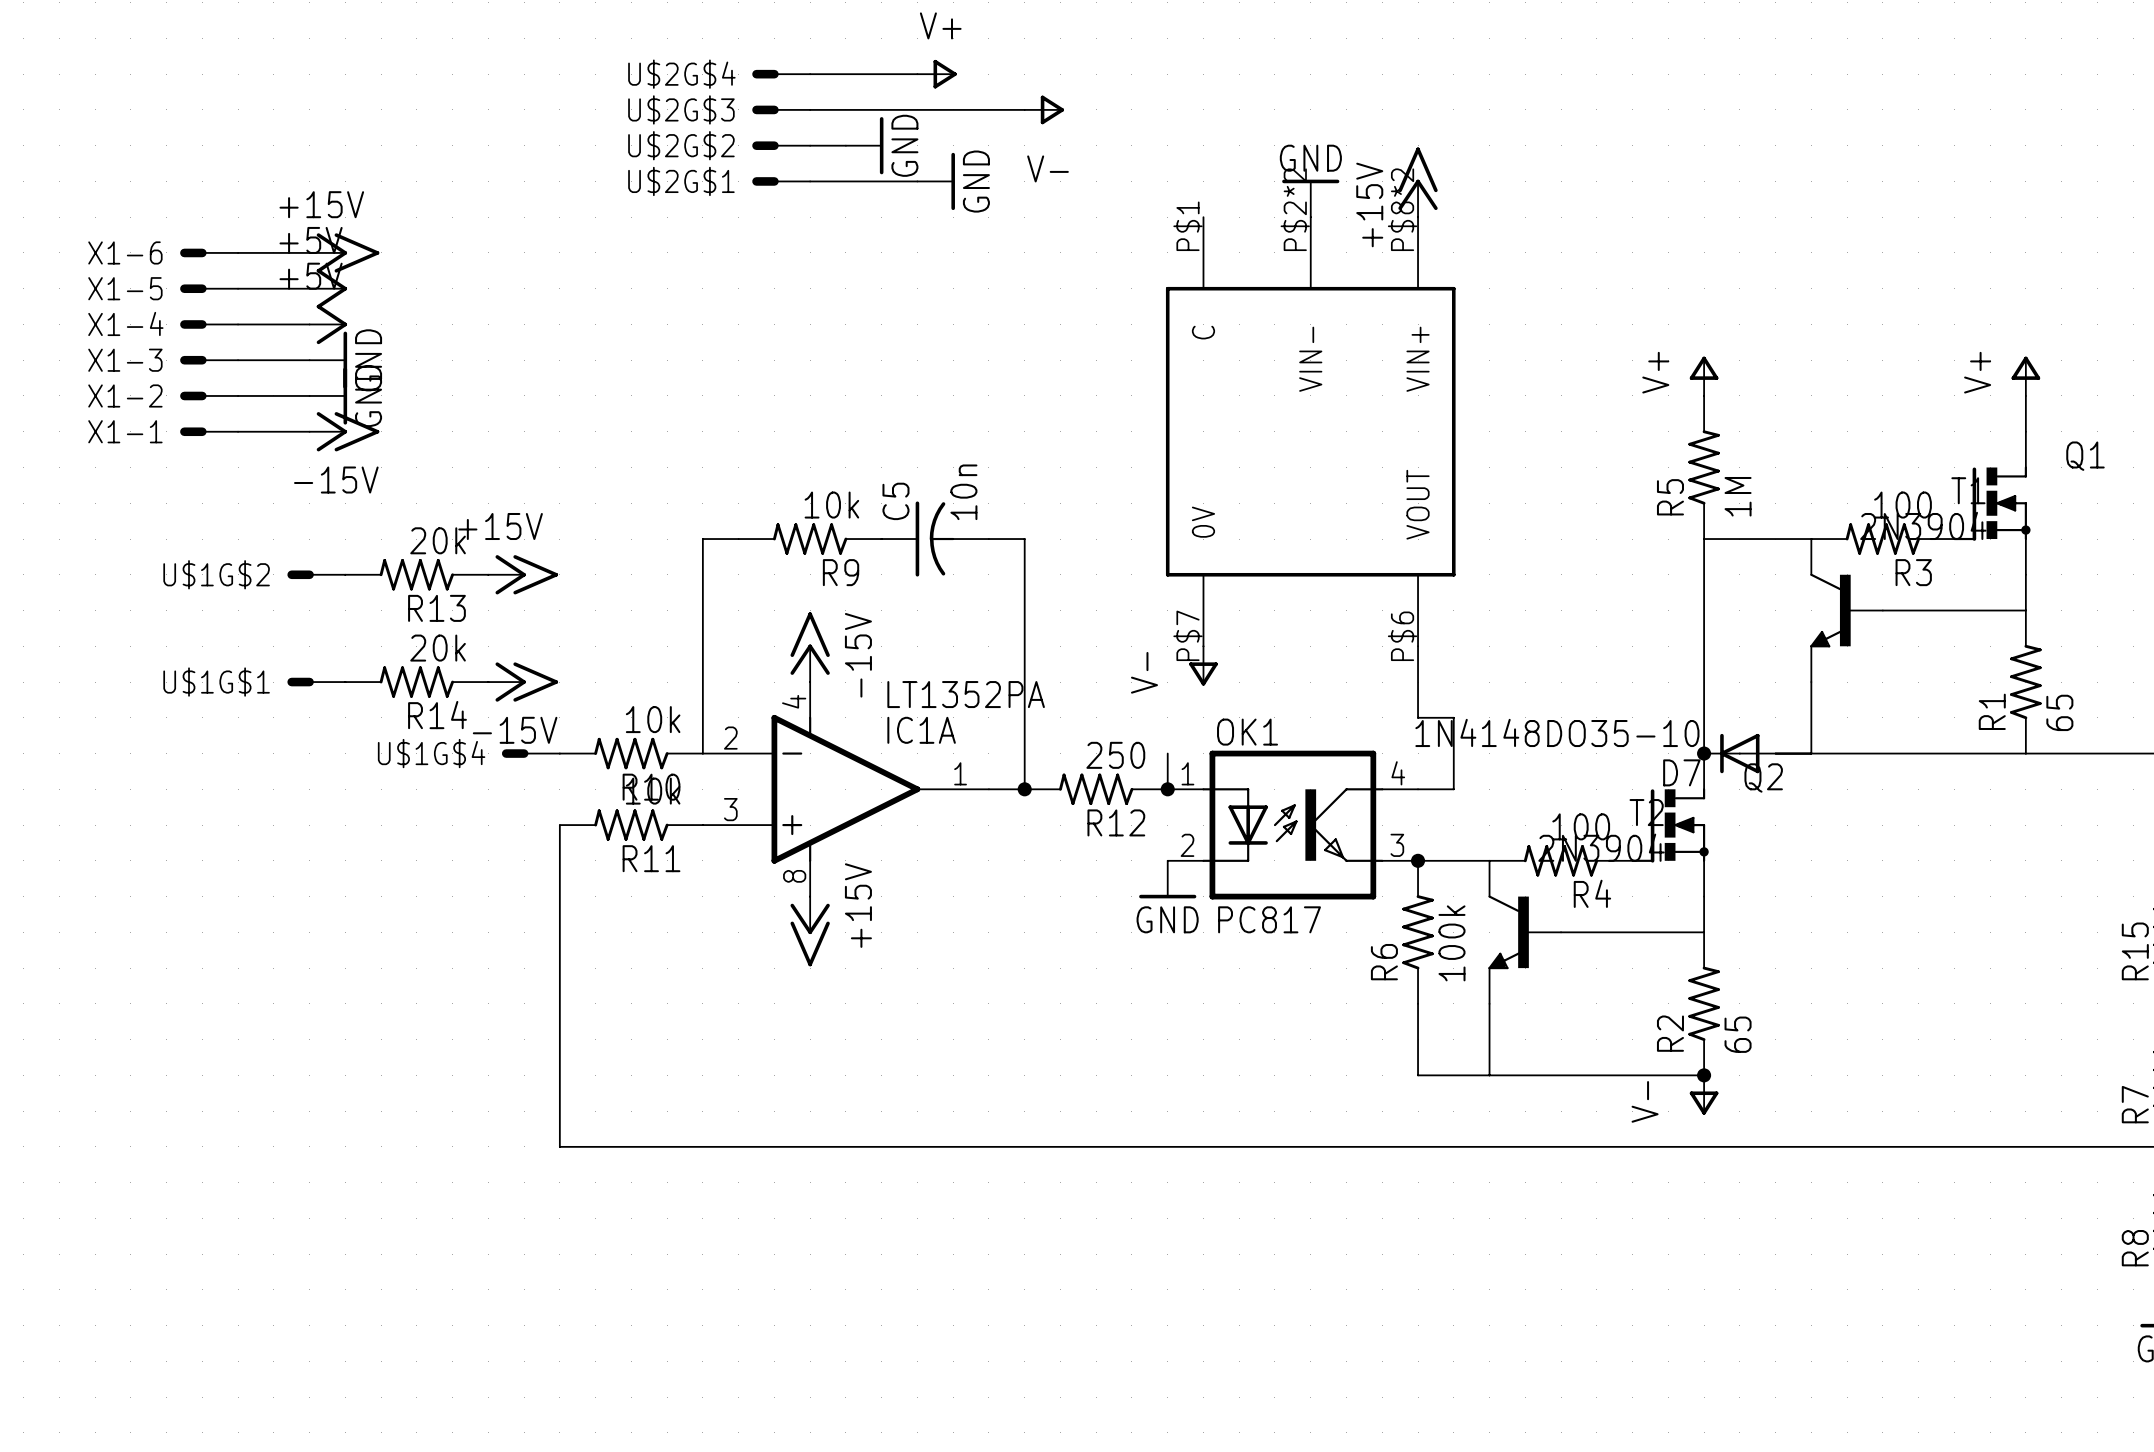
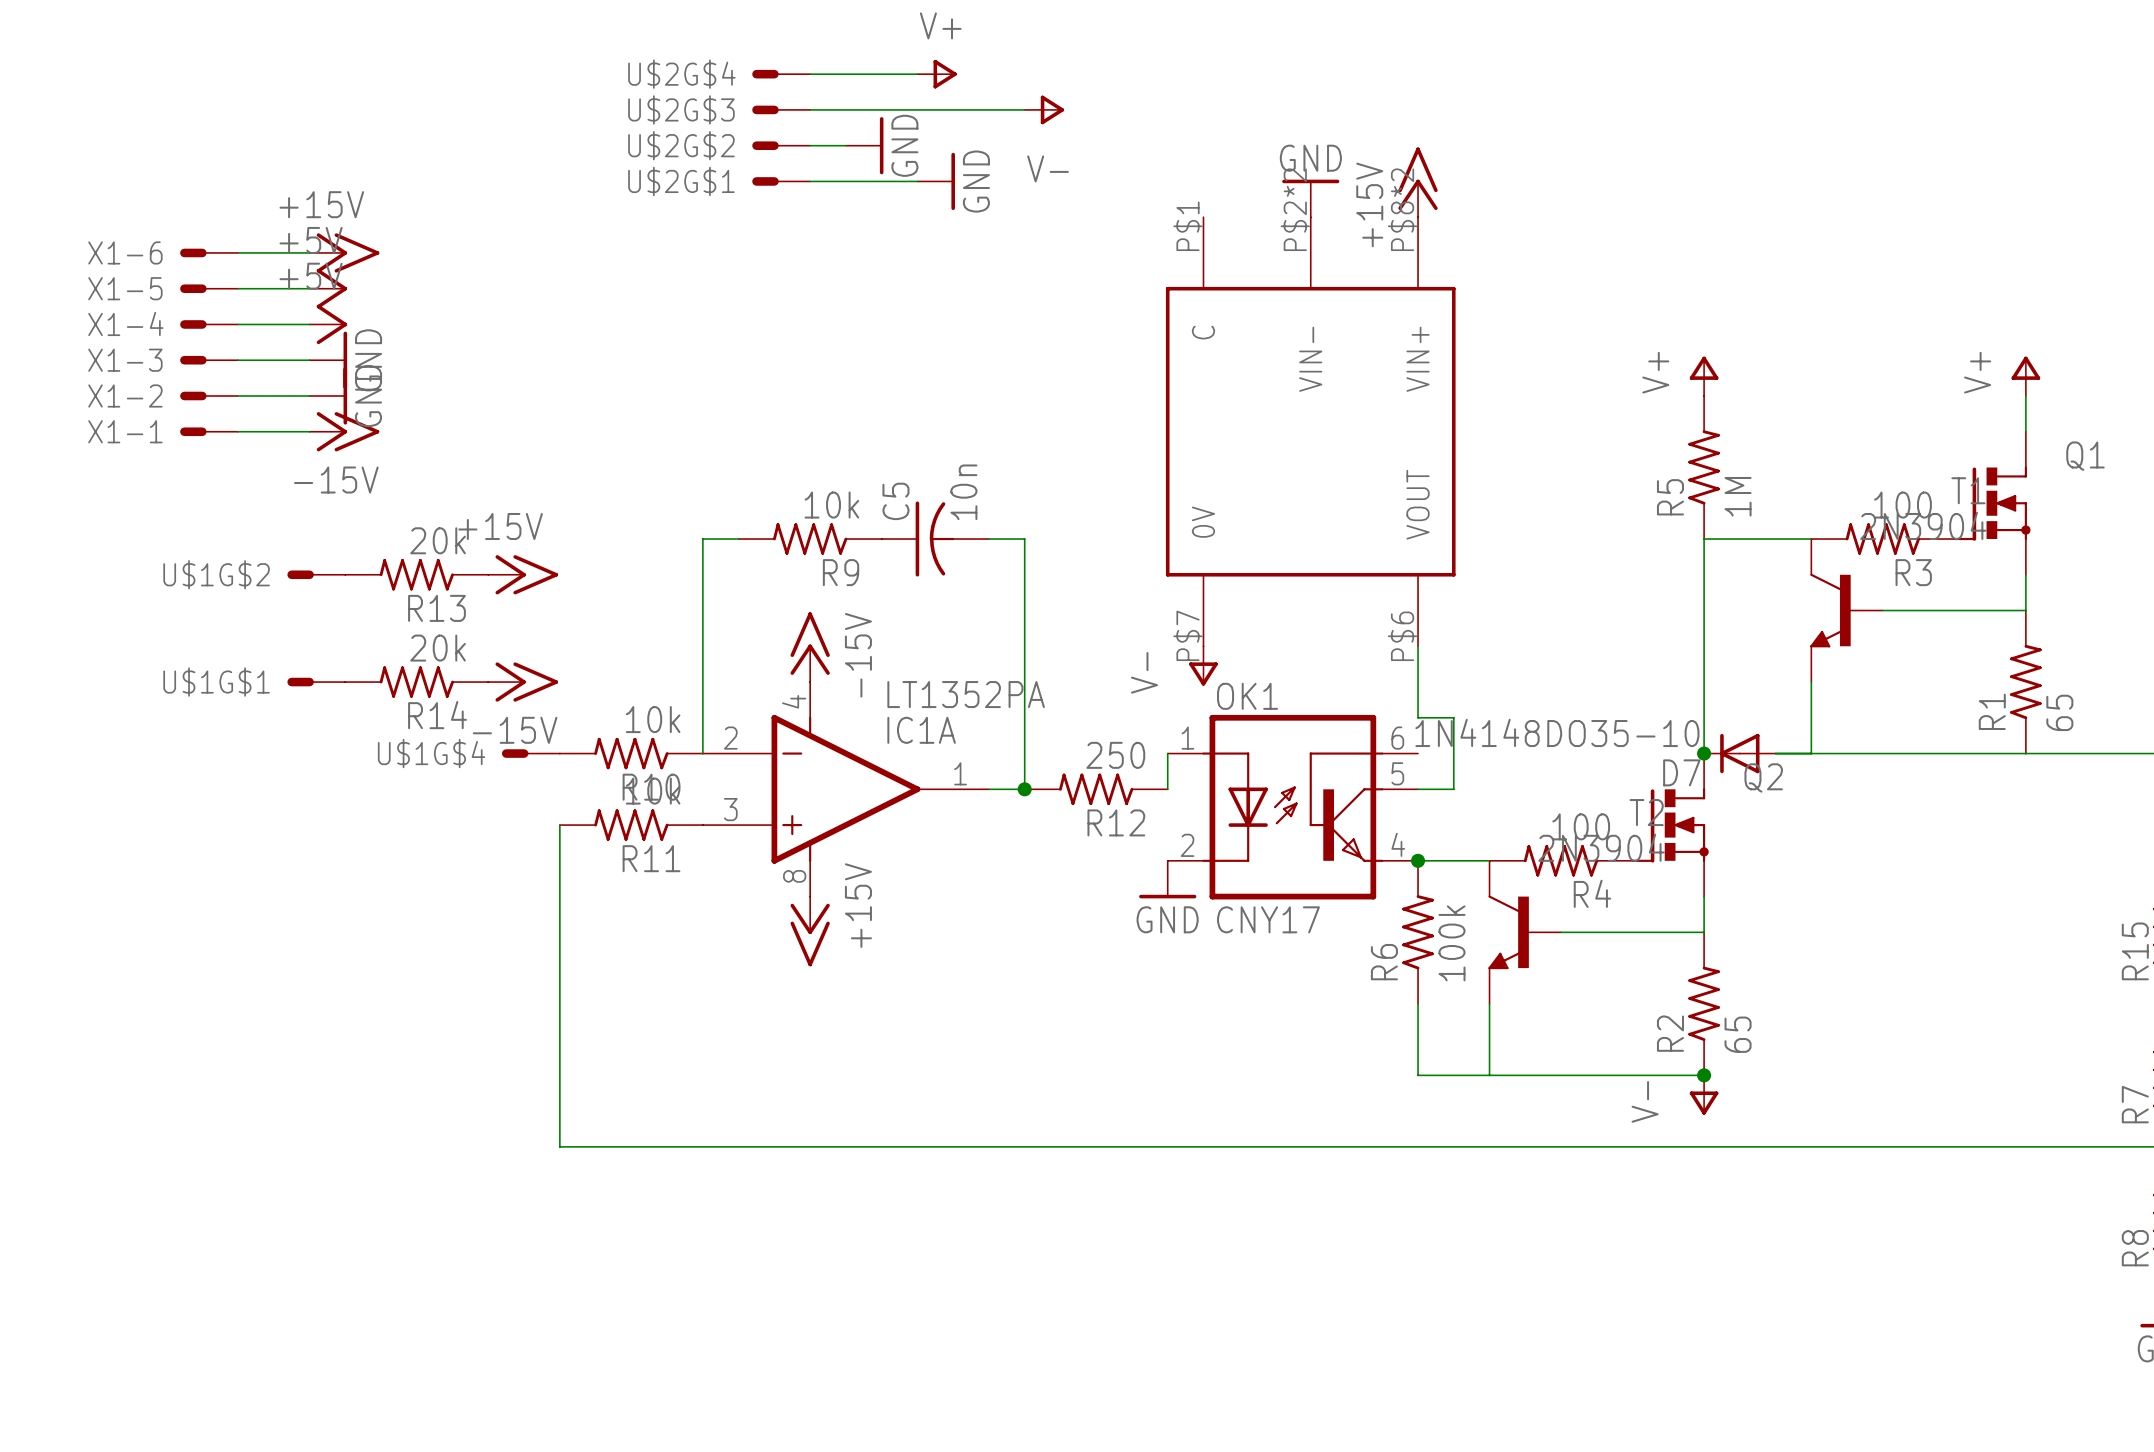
OK1 symbol: [1167, 750, 1419, 900] -> [1167, 714, 1419, 900]
junction: (1167, 789) -> none
OK1 value: PC817 (1269, 919) -> CNY17 (1268, 919)

